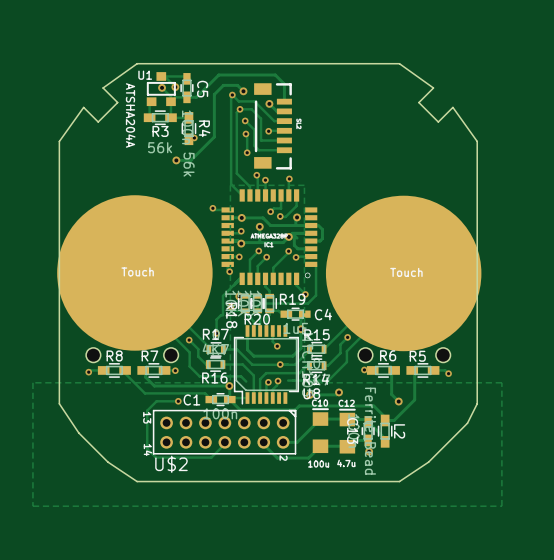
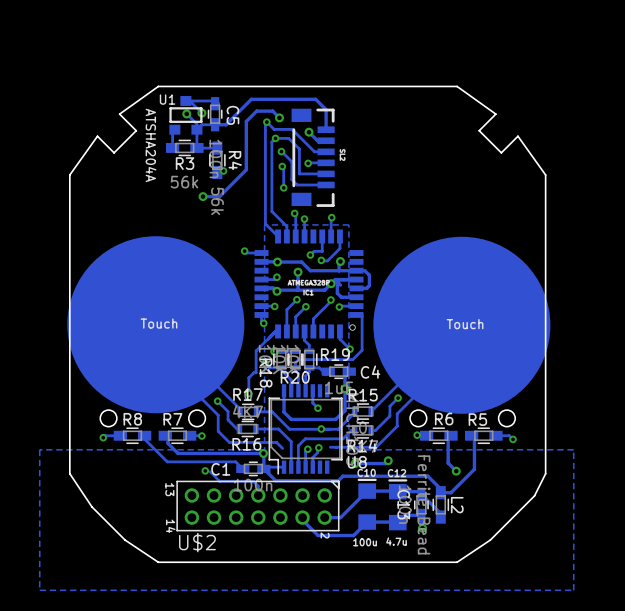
track: (178, 401) (156, 401) (147, 410) (147, 448) (155, 457) (211, 457) (224, 442) -> none
track: none -> (210, 471) (219, 481) (253, 481) (258, 486) (258, 495)

